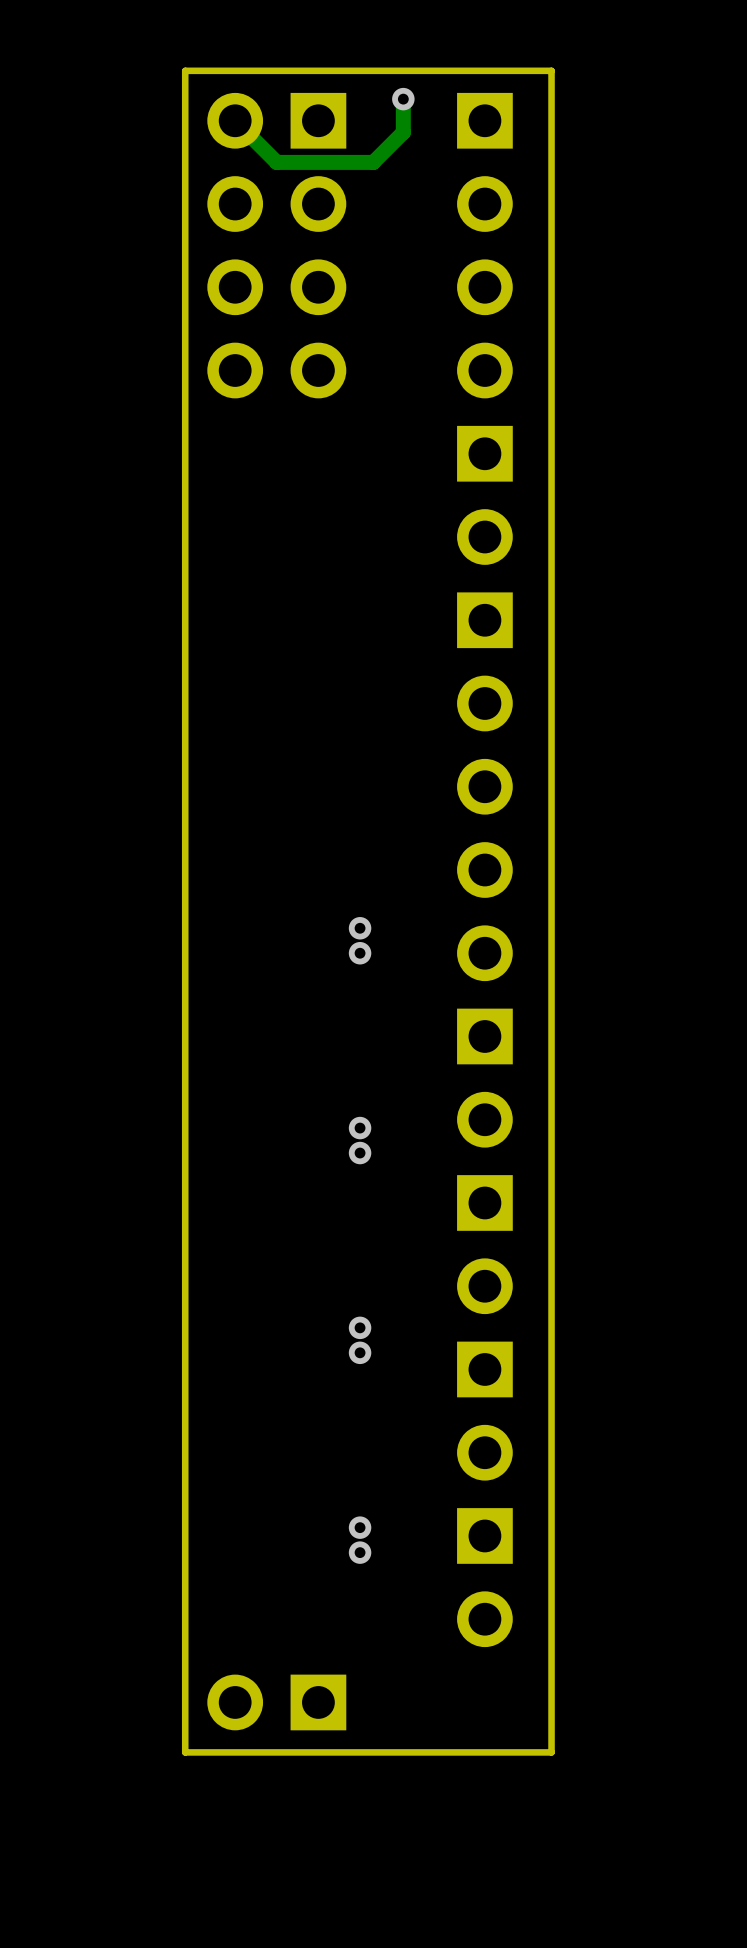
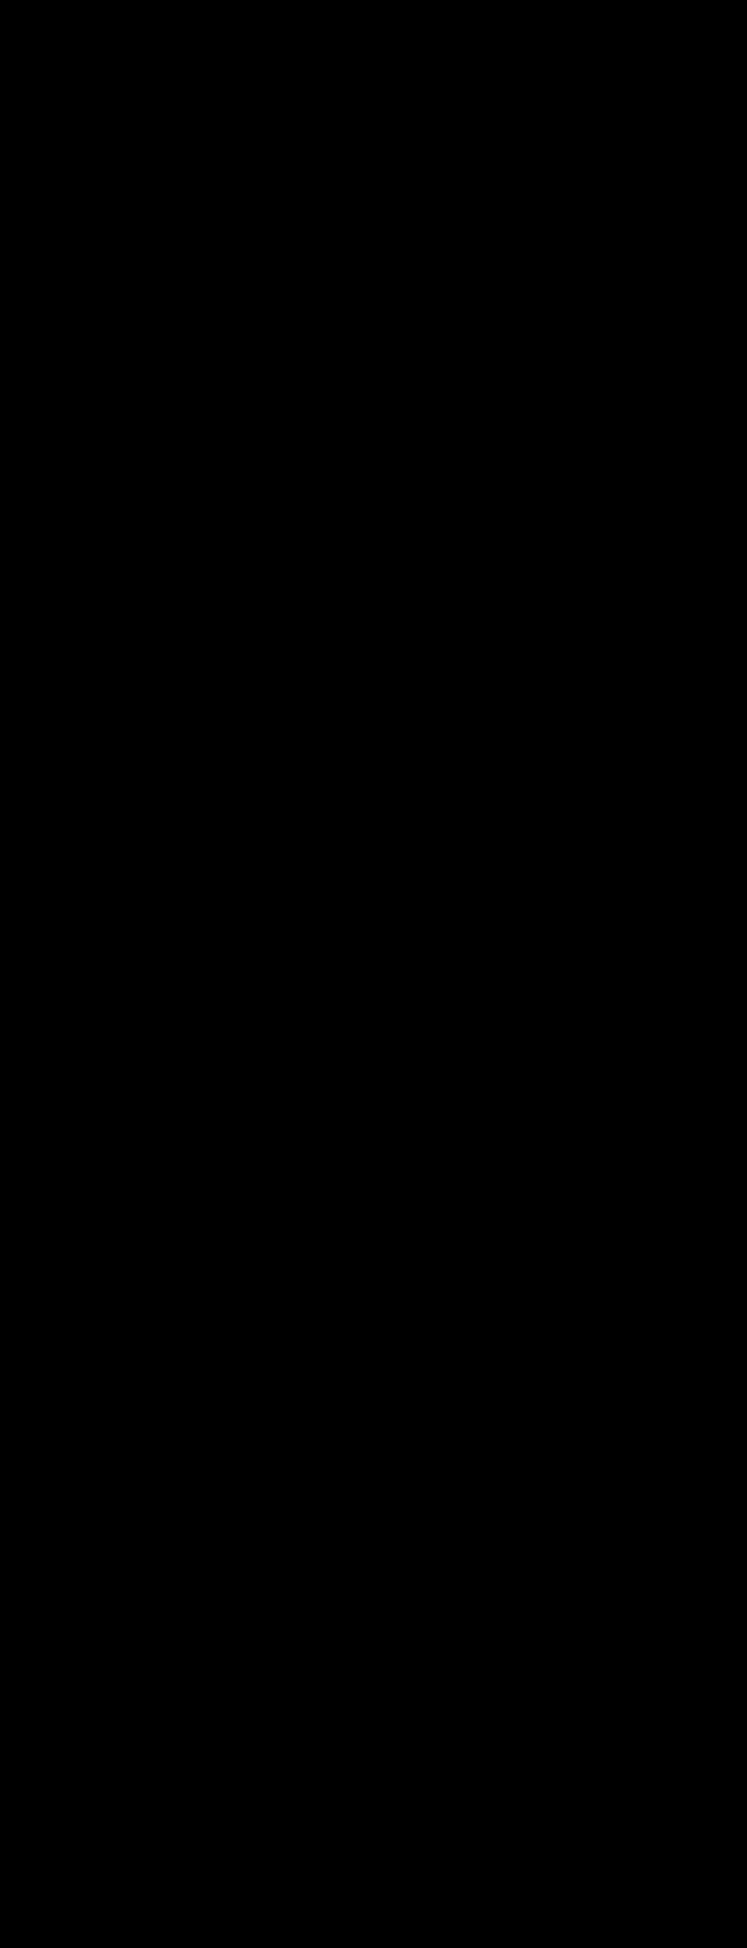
board edge: (551, 70) (185, 70) (185, 1752) (551, 1752) (551, 70) -> none
track: (403, 99) (403, 132) (373, 162) (276, 162) (235, 120) -> none
via: (403, 99) -> none
part: (276, 245) -> none
part: (484, 245) -> none
part: (484, 495) -> none
part: (484, 786) -> none
via: (360, 928) -> none
via: (360, 953) -> none
part: (484, 1078) -> none
via: (360, 1128) -> none
via: (360, 1153) -> none
part: (484, 1244) -> none
via: (360, 1327) -> none
via: (360, 1352) -> none
part: (484, 1411) -> none
via: (360, 1527) -> none
via: (360, 1552) -> none
part: (484, 1577) -> none
part: (276, 1702) -> none

